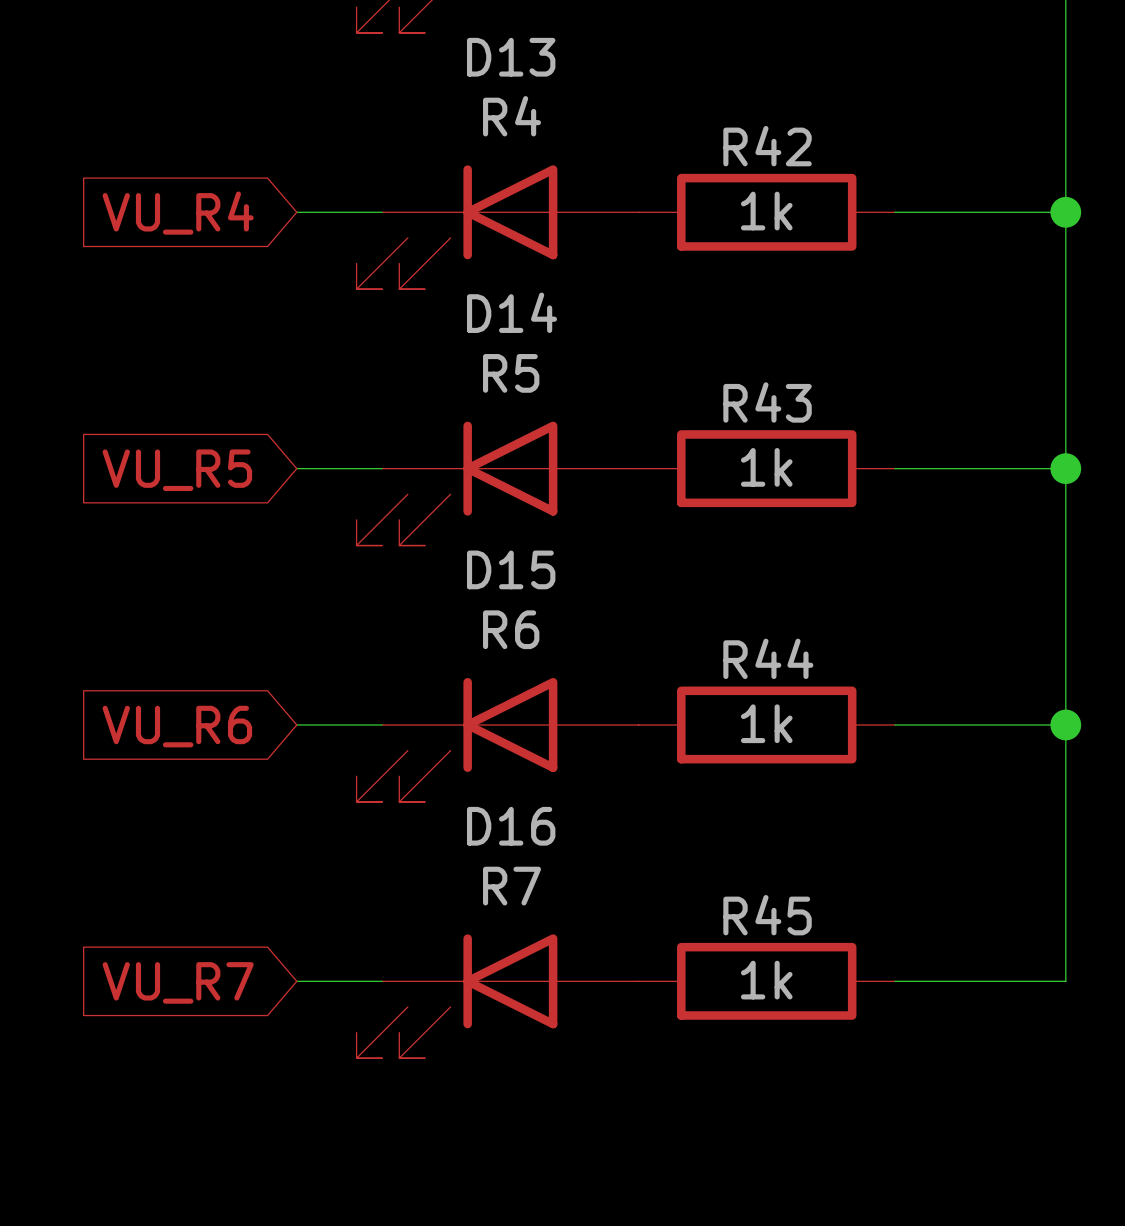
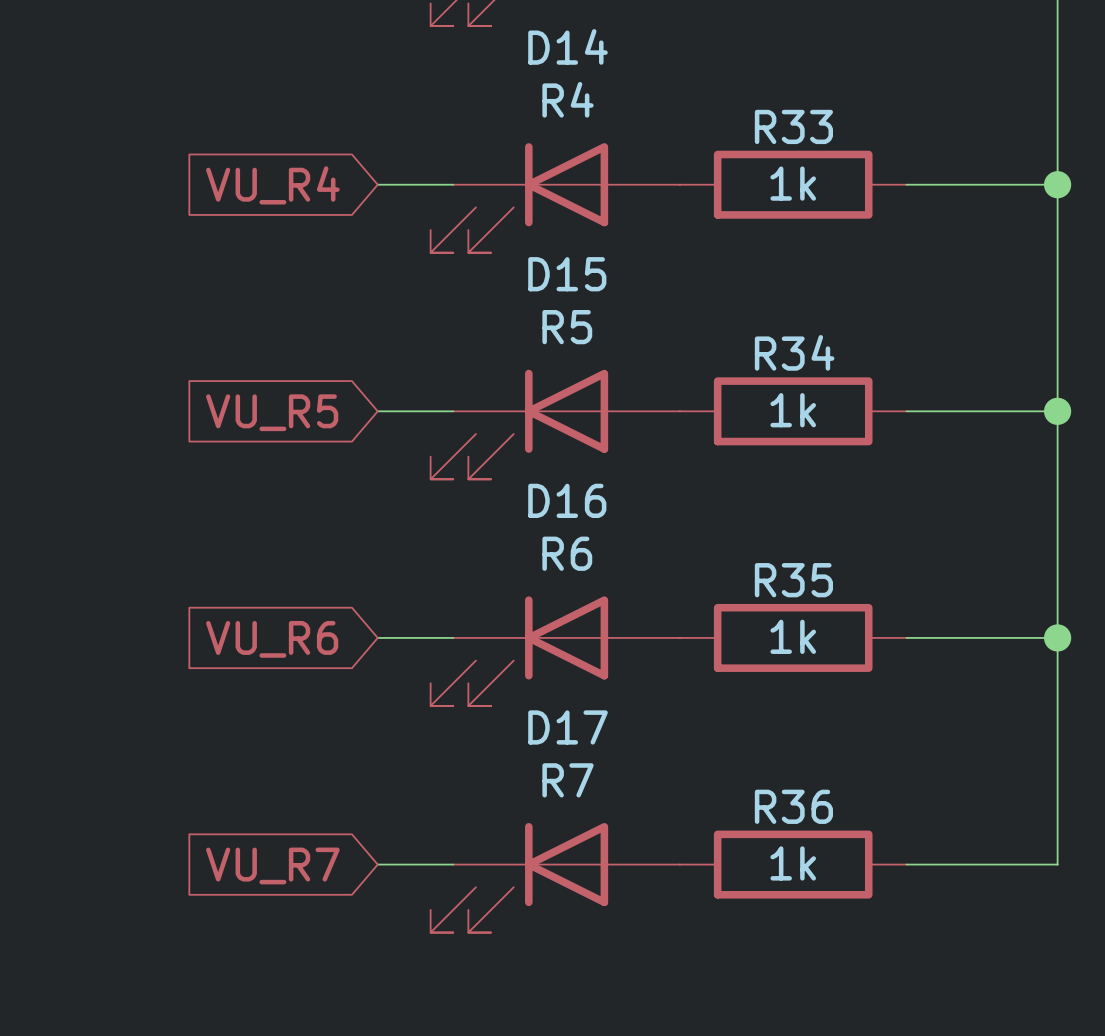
D13 name: D13 (511, 57) -> D14 (568, 46)
R42 name: R42 (767, 146) -> R33 (793, 126)
D14 name: D14 (511, 312) -> D15 (567, 274)
R43 name: R43 (767, 402) -> R34 (794, 352)
D15 name: D15 (511, 569) -> D16 (567, 500)
R44 name: R44 (768, 658) -> R35 (793, 580)
D16 name: D16 (511, 826) -> D17 (568, 727)
R45 name: R45 (767, 915) -> R36 (793, 806)

